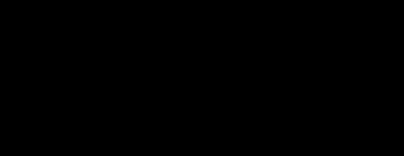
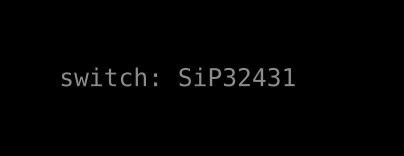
text: none -> switch: SiP32431 (178, 76)

